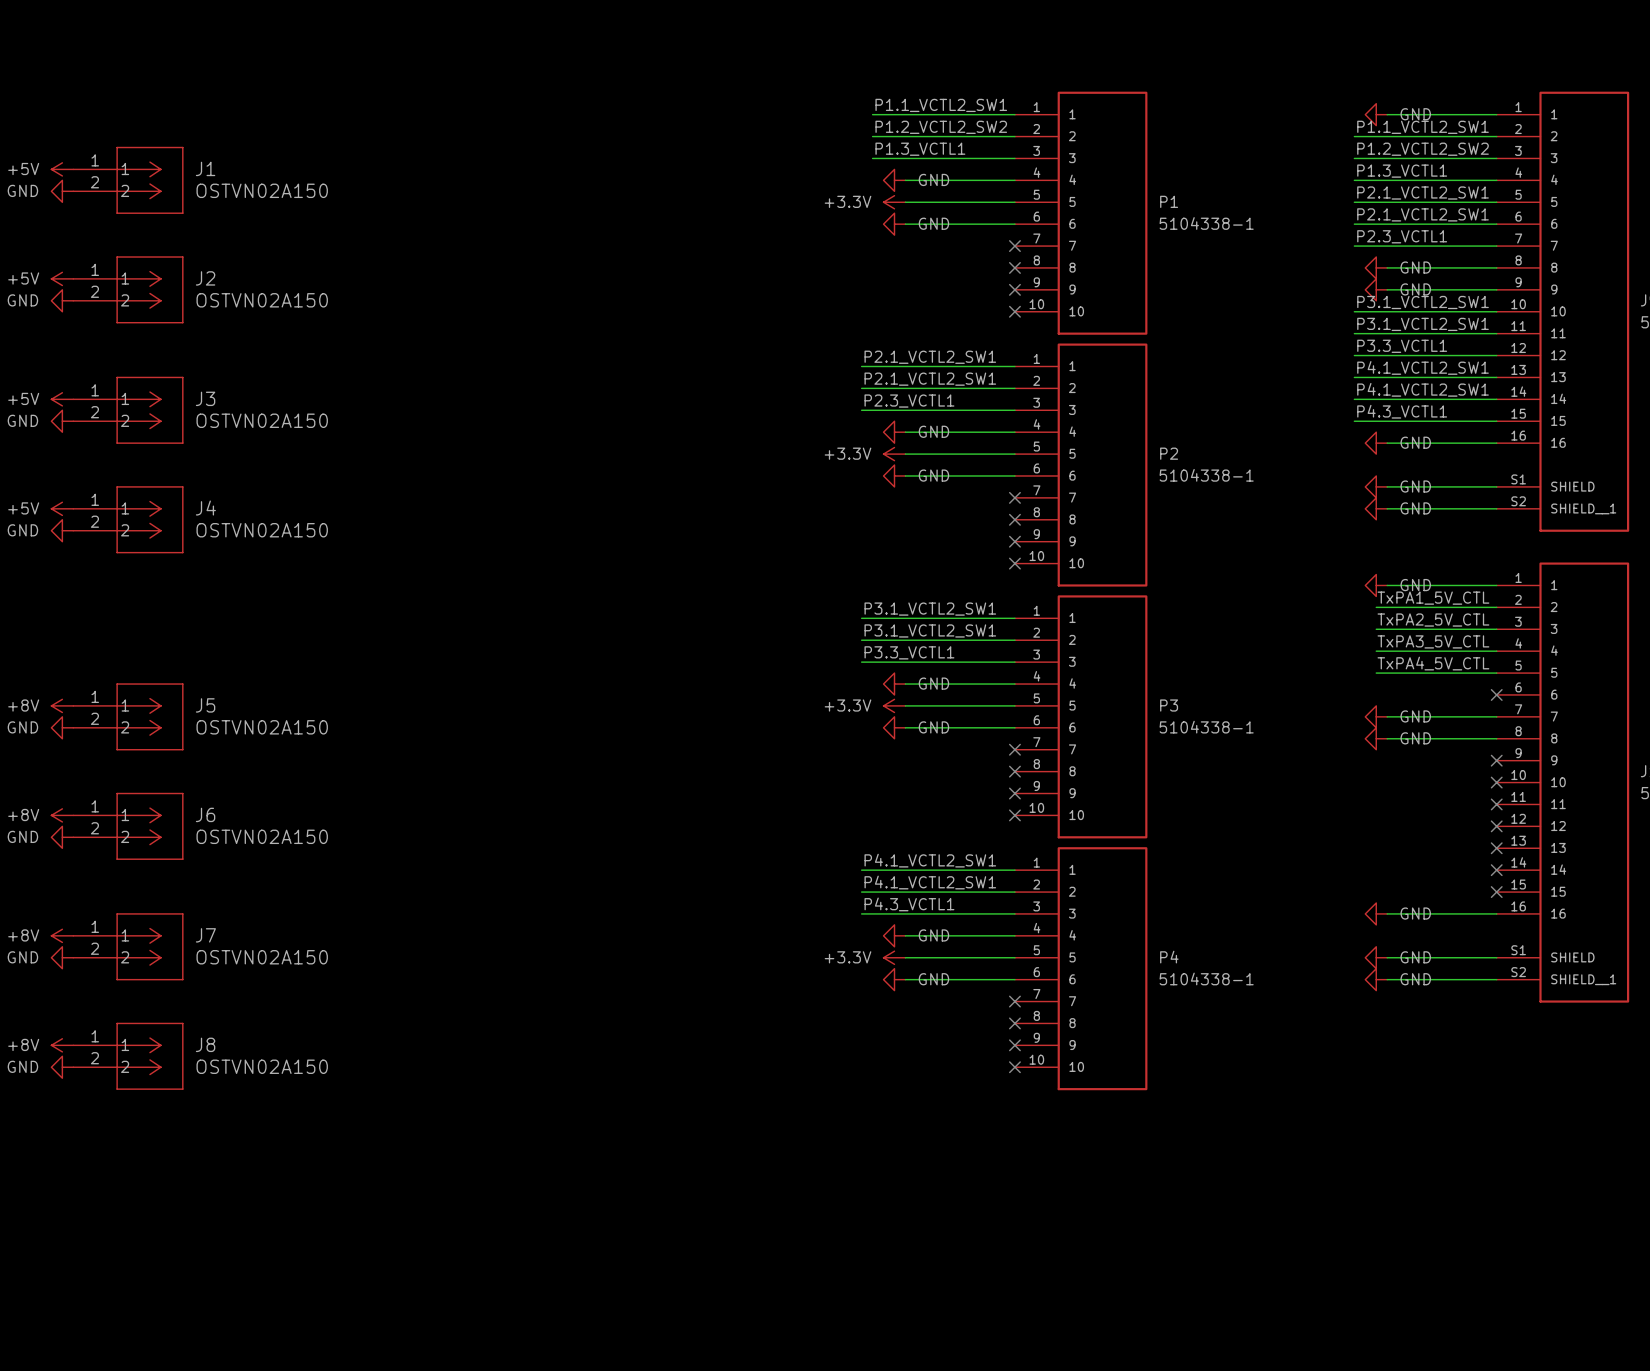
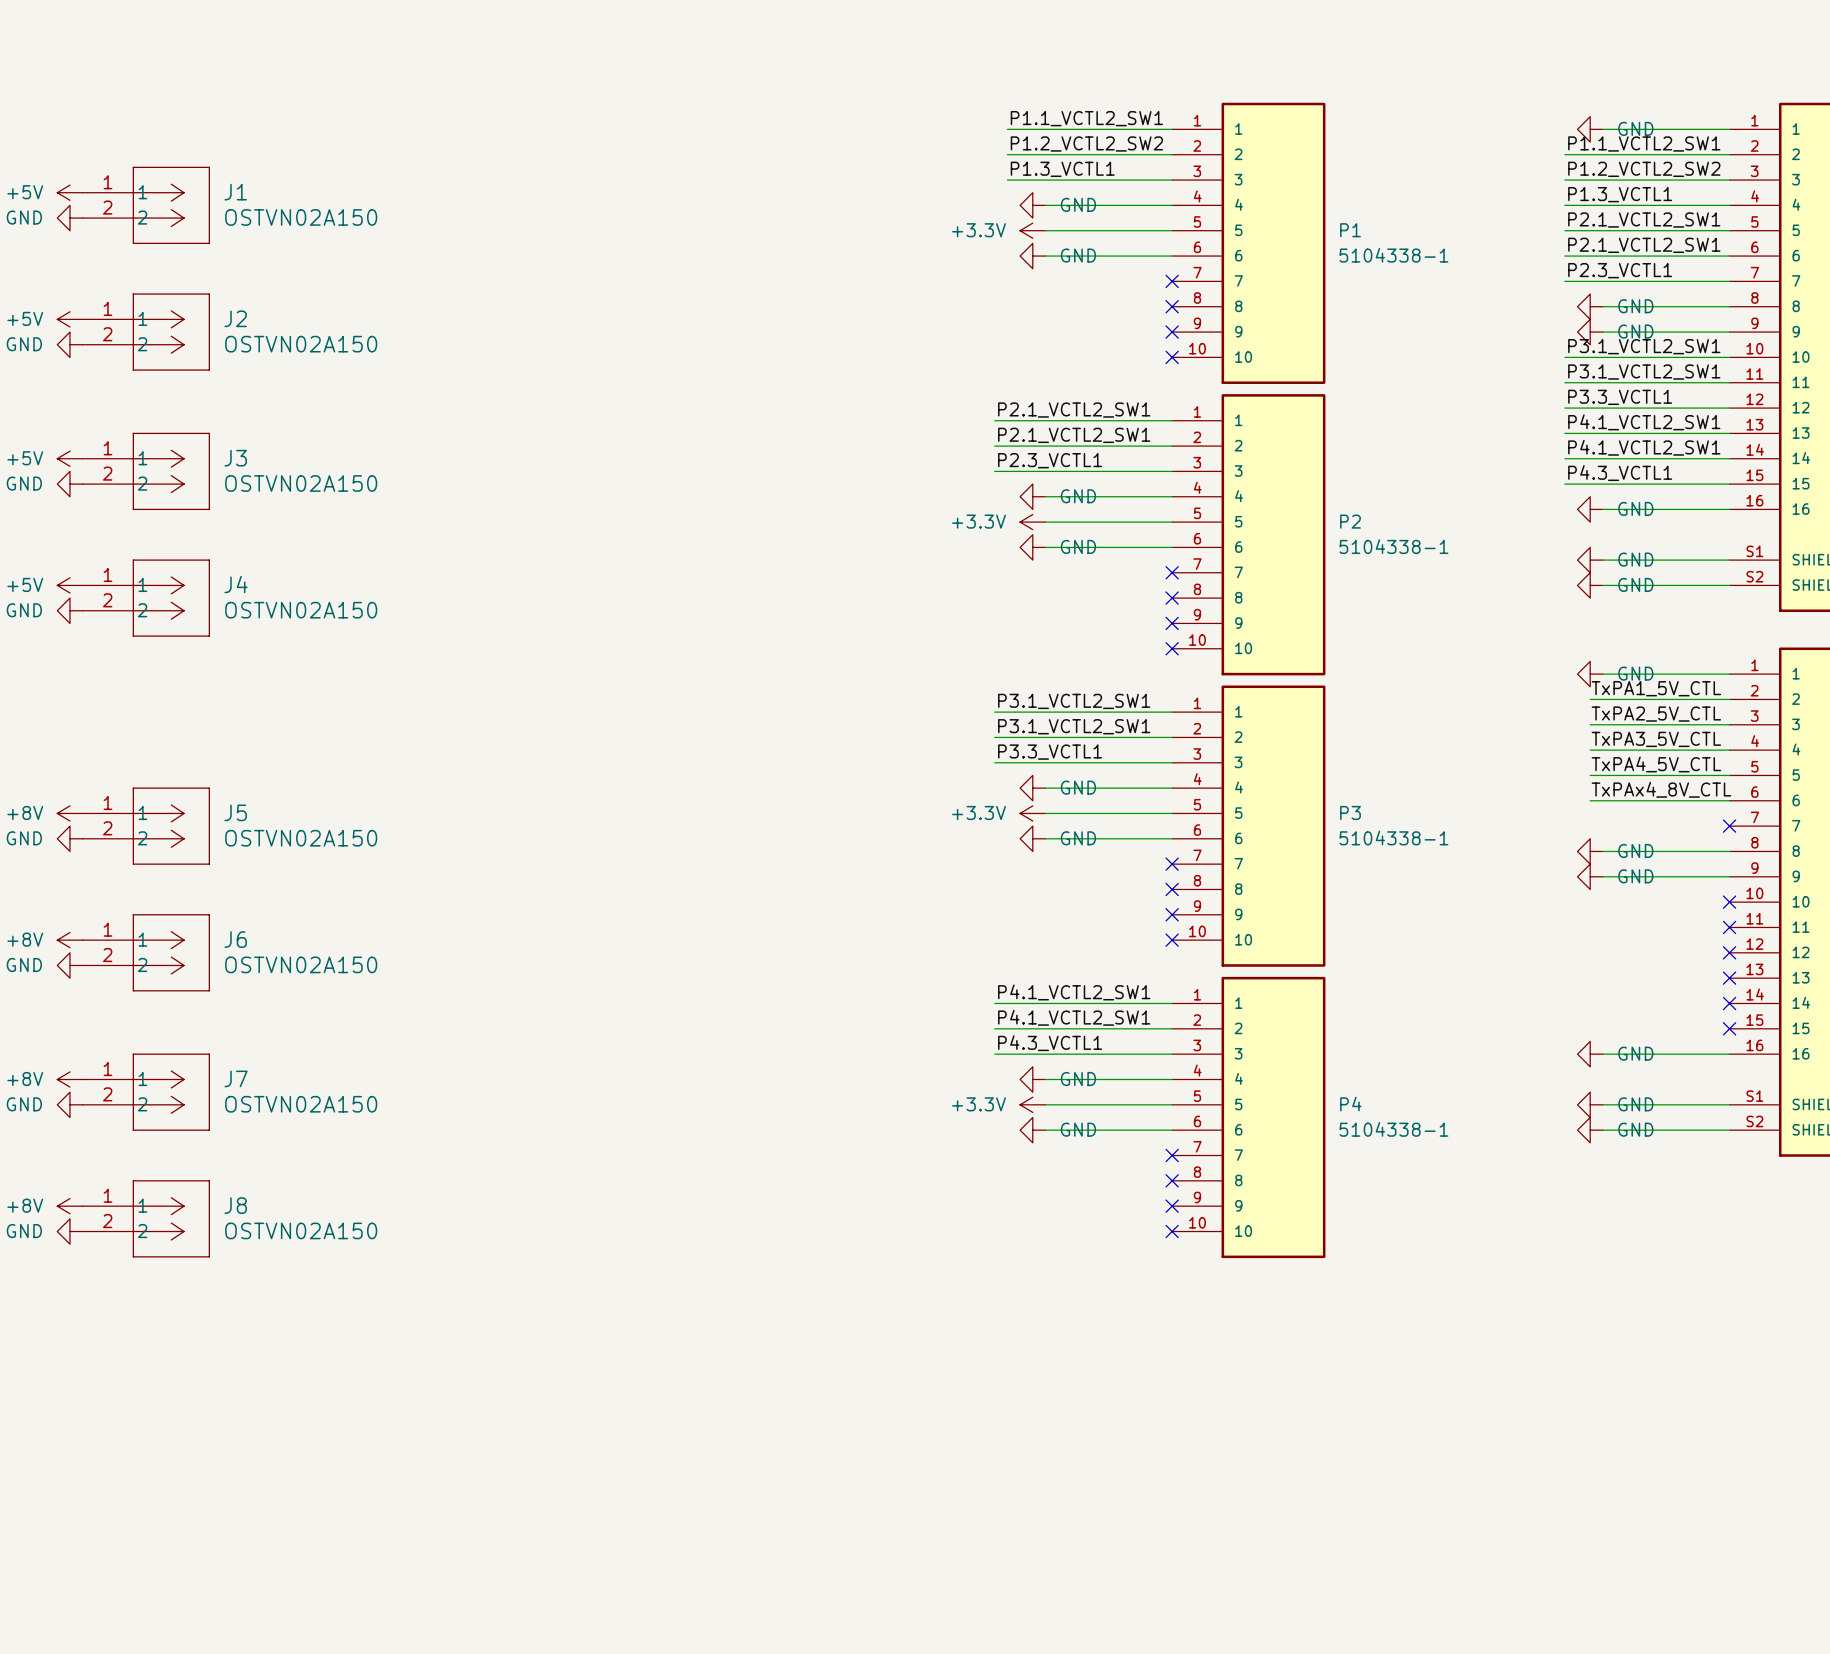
label: none -> TxPAx4_8V_CTL (1661, 789)
wire: none -> (1590, 800) (1729, 800)
no-connect mark: (1496, 694) -> none
power symbol position: GND (1376, 716) -> GND (1590, 876)
wire: (1387, 716) (1496, 716) -> (1602, 876) (1729, 876)
no-connect mark: none -> (1729, 826)
no-connect mark: (1496, 760) -> none

